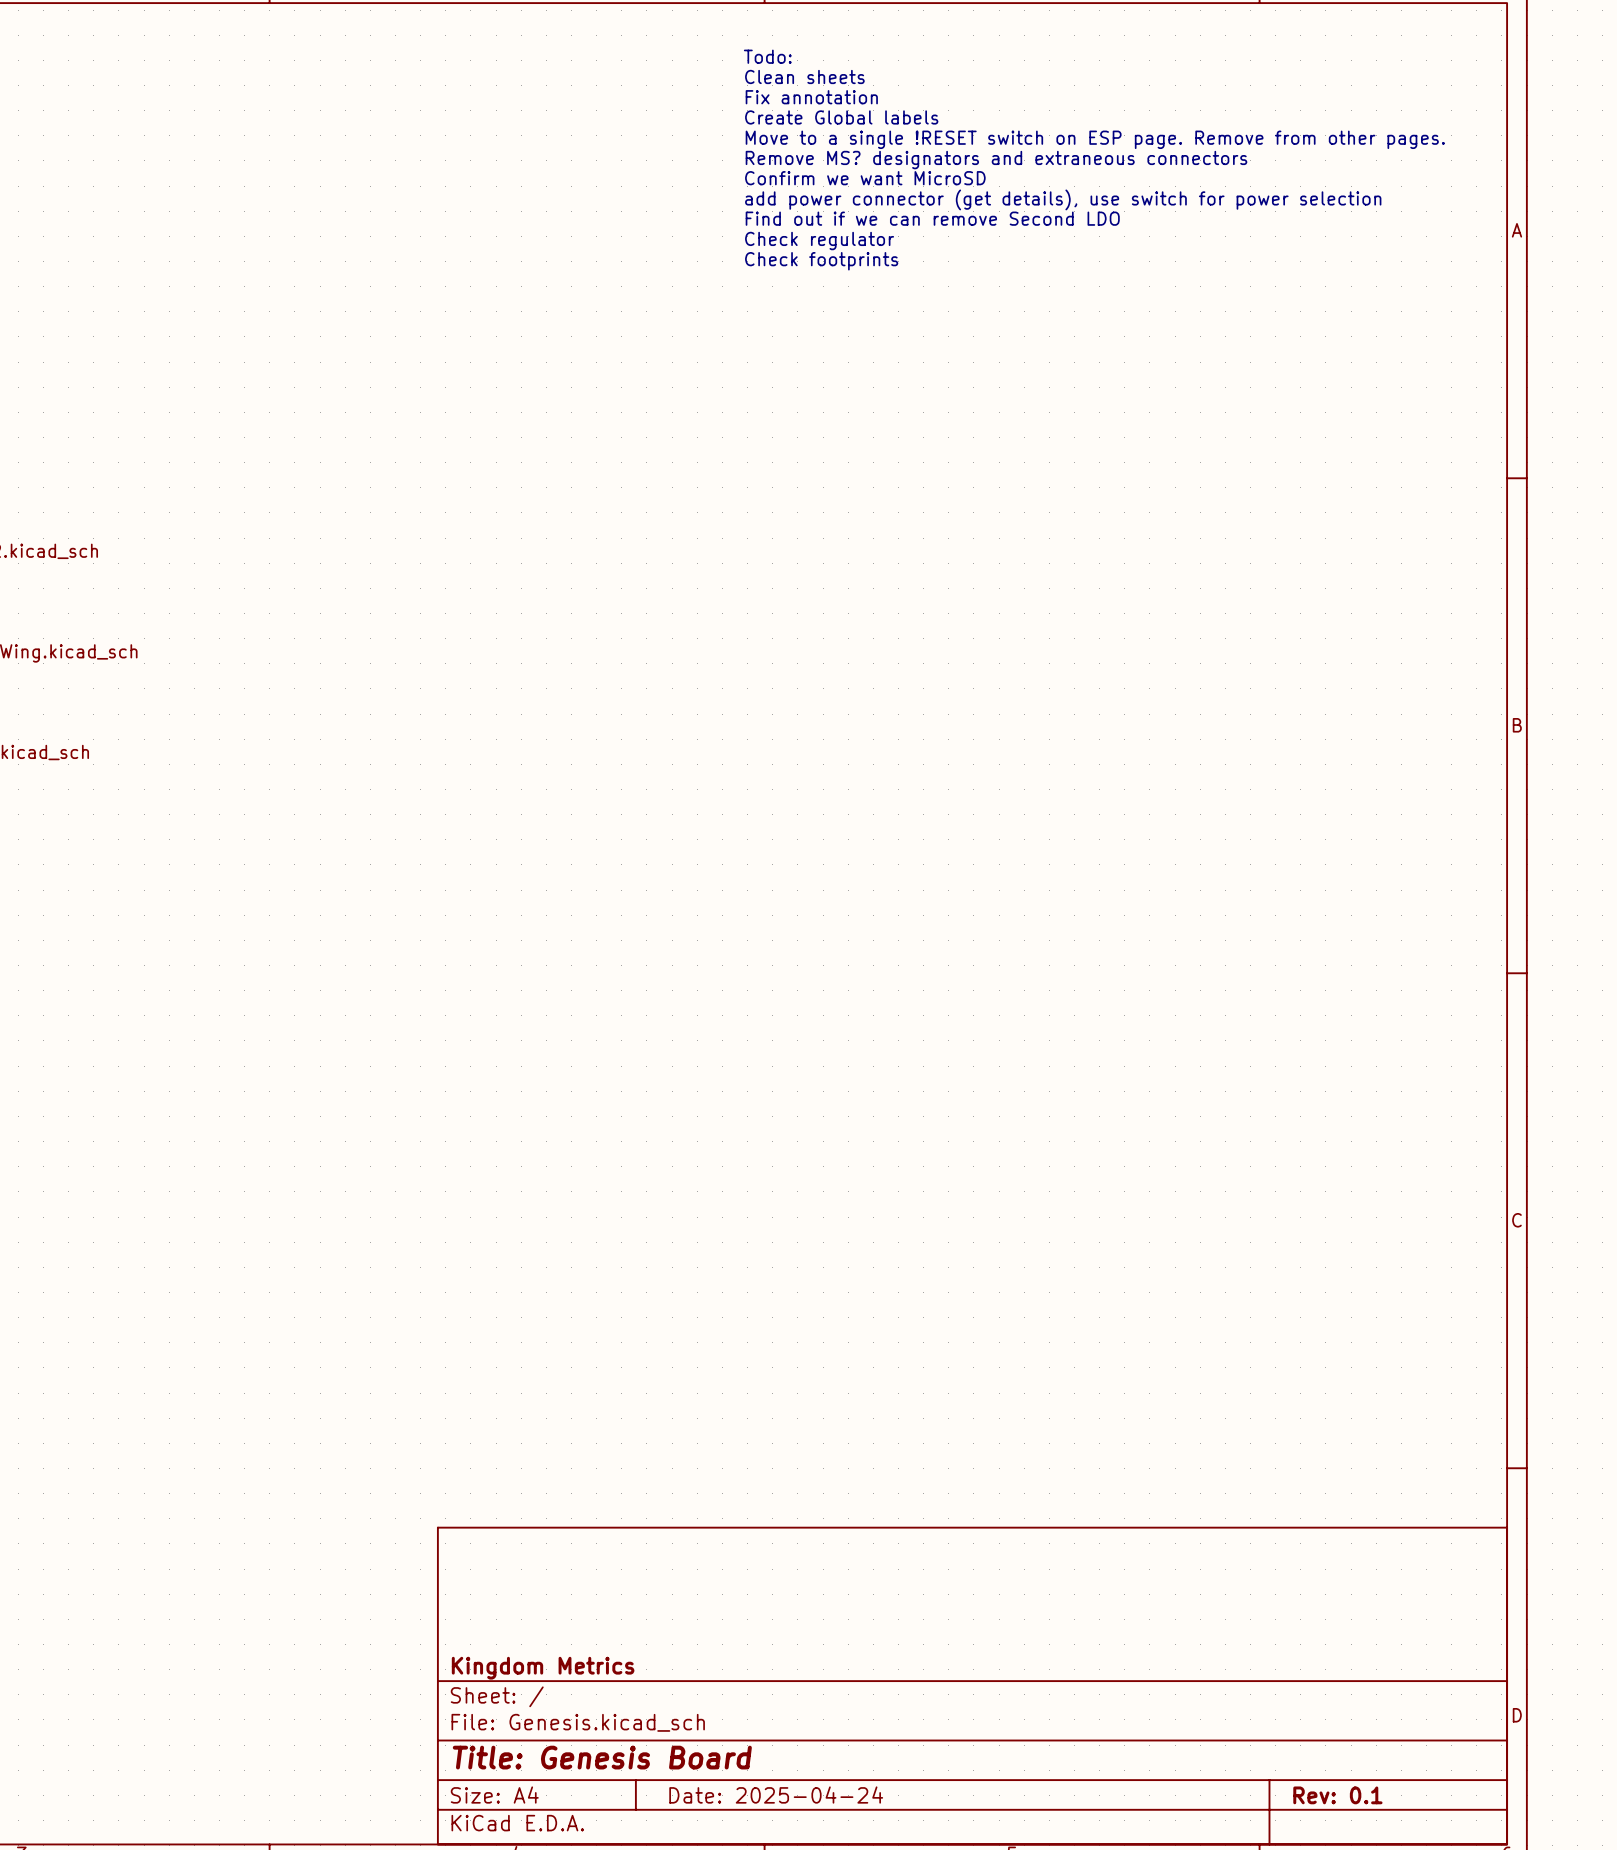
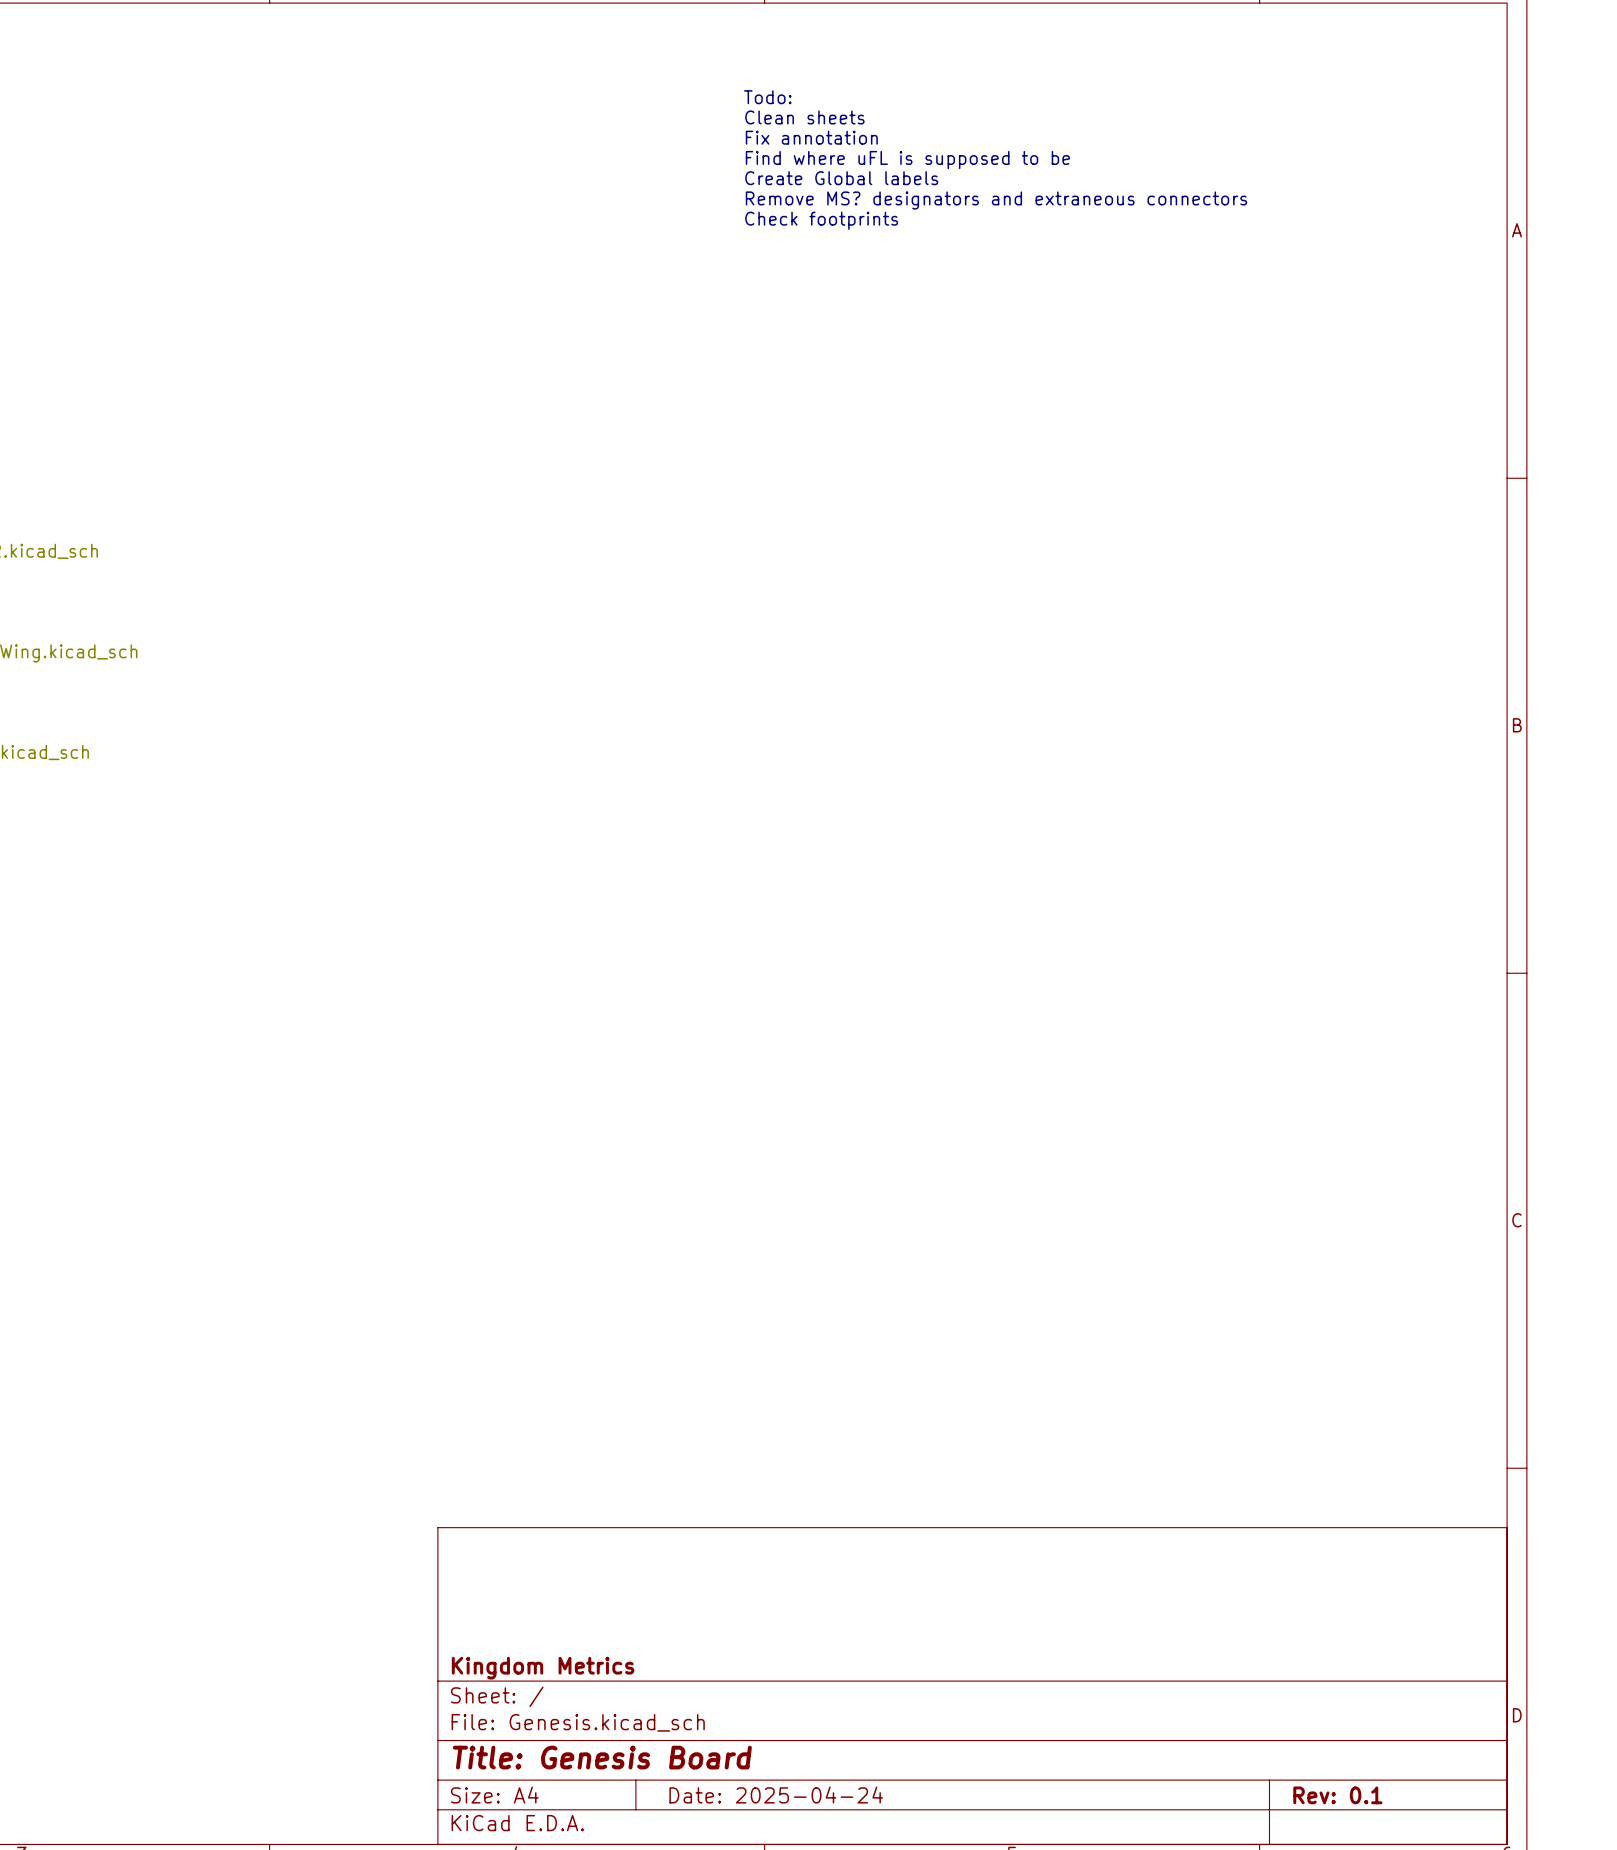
text: Todo: (767, 56) -> none
text: Clean sheets (804, 76) -> none
text: Fix annotation (811, 97) -> Todo: (767, 97)
text: Create Global labels (841, 117) -> Clean sheets (804, 117)
text: Move to a single !RESET switch on ESP page. Remove from other pages. (1095, 139) -> Fix annotation (811, 137)
text: Remove MS? designators and extraneous connectors (996, 160) -> Find where uFL is supposed to be (907, 160)
text: Confirm we want MicroSD (865, 178) -> Create Global labels (841, 178)
text: add power connector (get details), use switch for power selection (1063, 199) -> Remove MS? designators and extraneous connectors (996, 200)
text: Find out if we can remove Second LDO (932, 218) -> Check footprints (821, 220)
text: Check regulator (819, 241) -> none
text: Check footprints (821, 261) -> none

